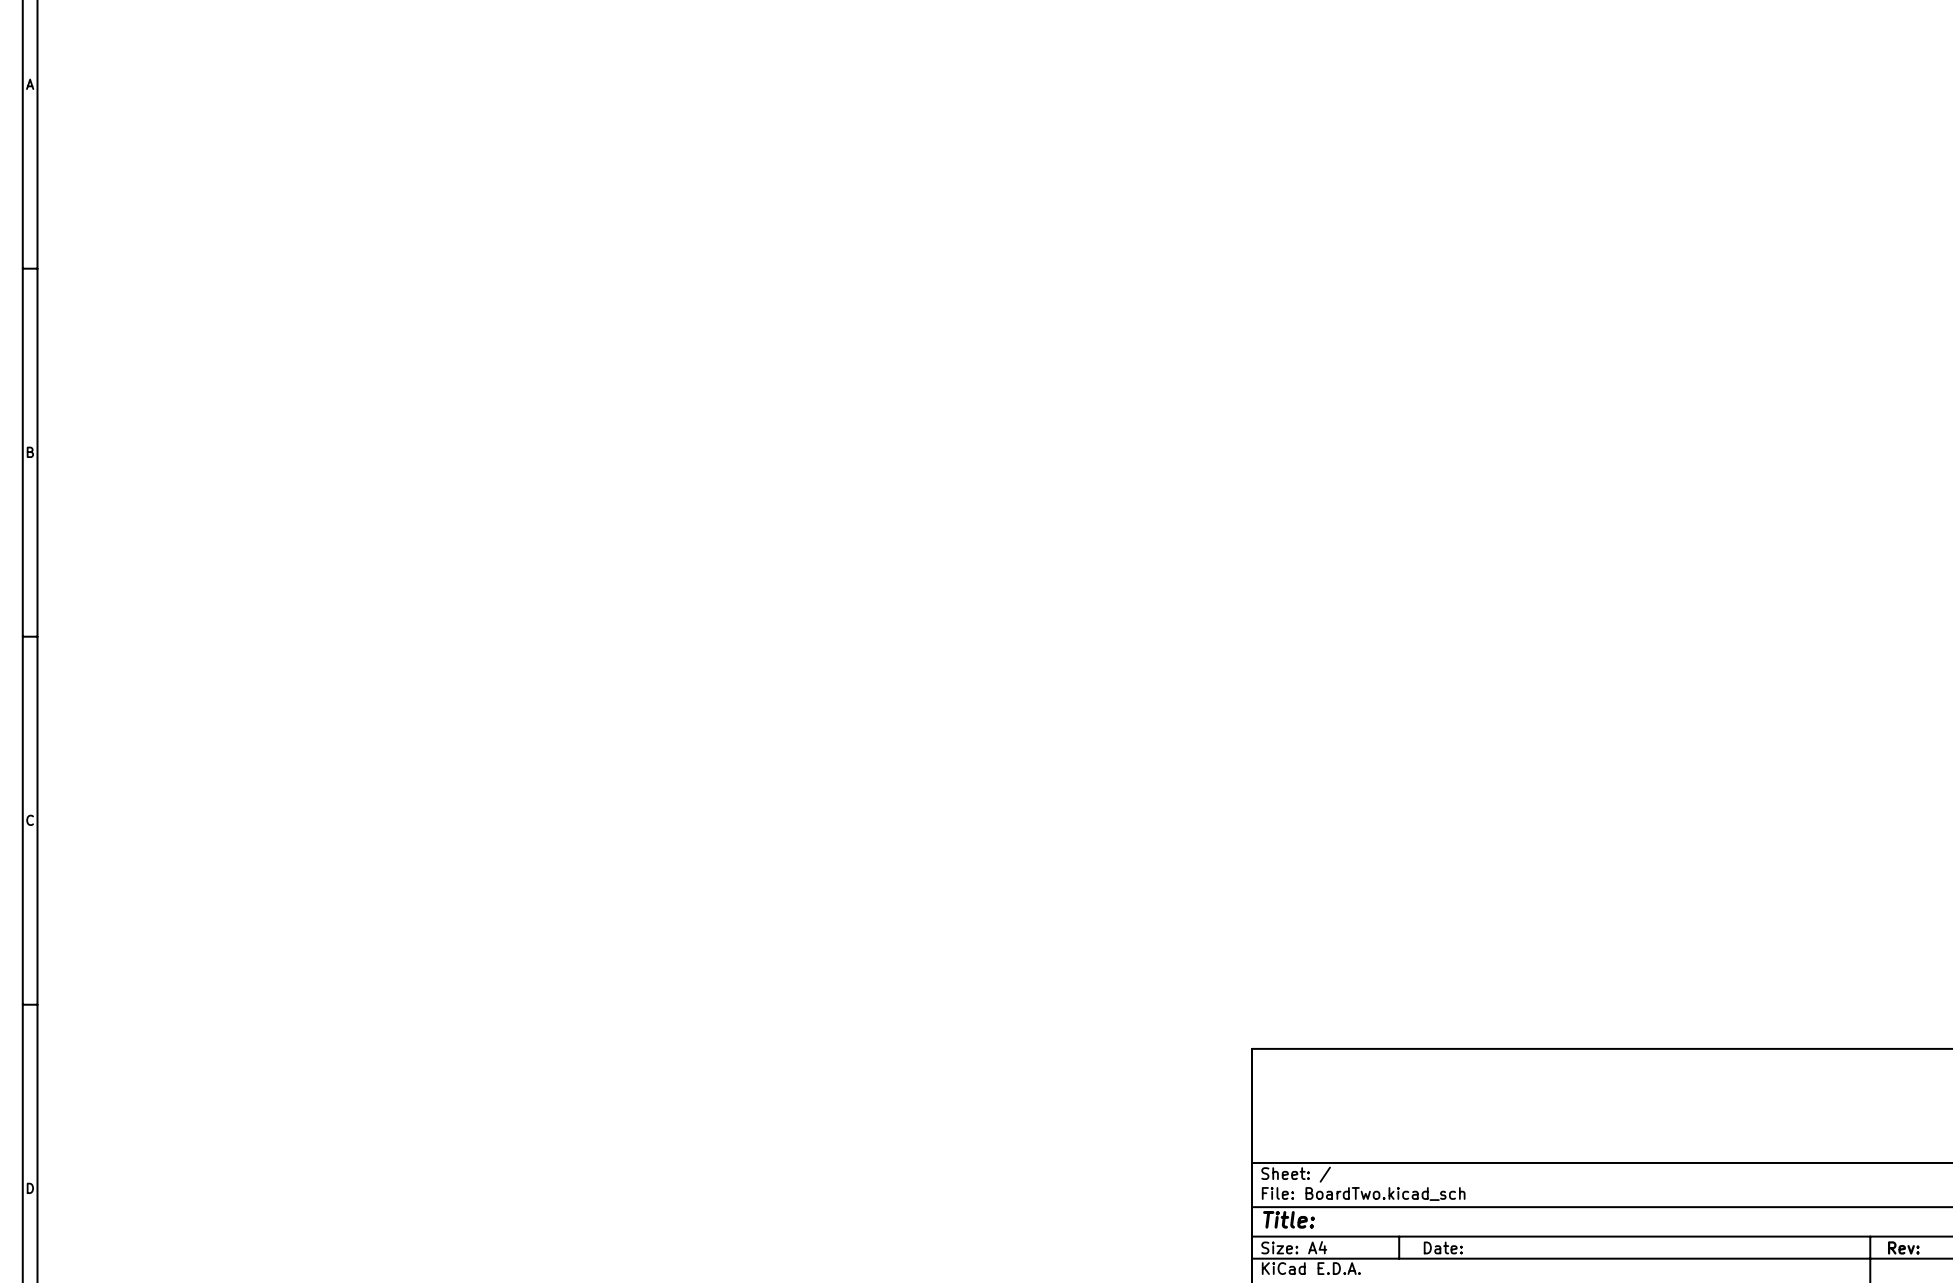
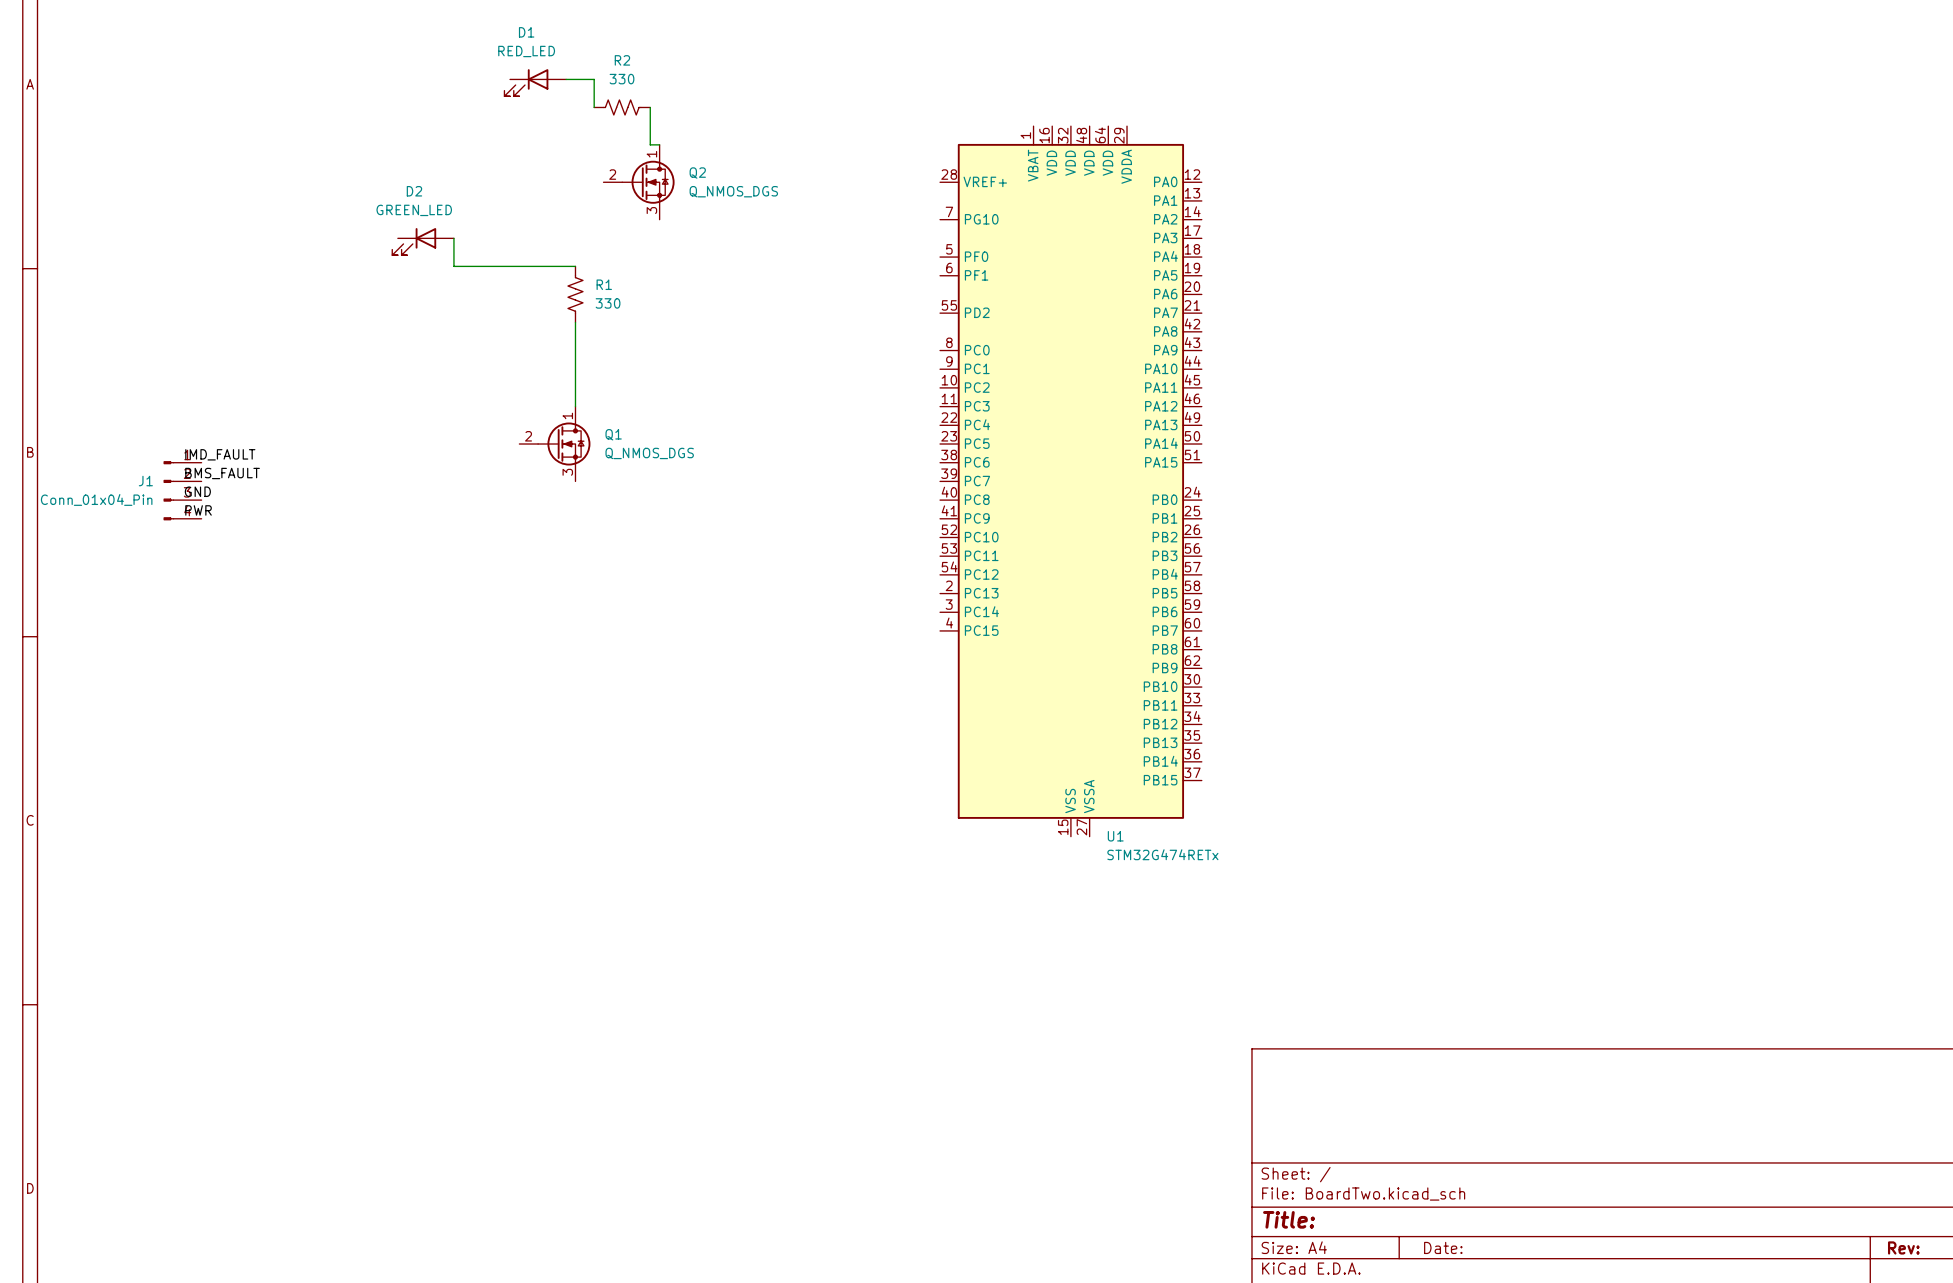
wire: none -> (566, 79) (594, 79) (594, 107)
D1: none -> RED_LED (535, 82)
R2: none -> 330 (622, 107)
wire: none -> (650, 107) (650, 144) (659, 144)
Q2: none -> Q_NMOS_DGS (639, 182)
wire: none -> (453, 238) (453, 266) (575, 266)
D2: none -> GREEN_LED (423, 241)
R1: none -> 330 (575, 294)
wire: none -> (575, 322) (575, 406)
Q1: none -> Q_NMOS_DGS (554, 444)
label: none -> IMD_FAULT (220, 454)
label: none -> BMS_FAULT (222, 473)
U1: none -> STM32G474RETx (1070, 481)
J1: none -> Conn_01x04_Pin (182, 490)
label: none -> GND (197, 491)
label: none -> PWR (198, 510)

